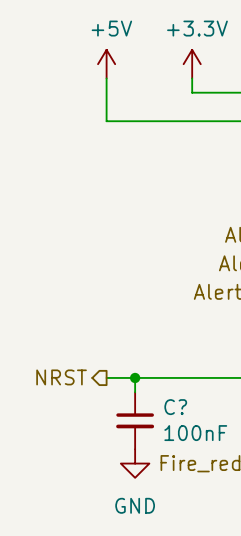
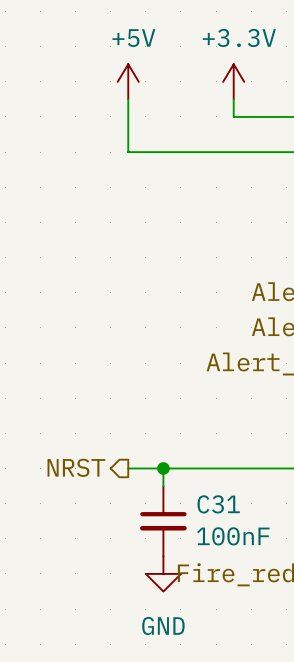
C? name: C? (175, 407) -> C31 (218, 504)

